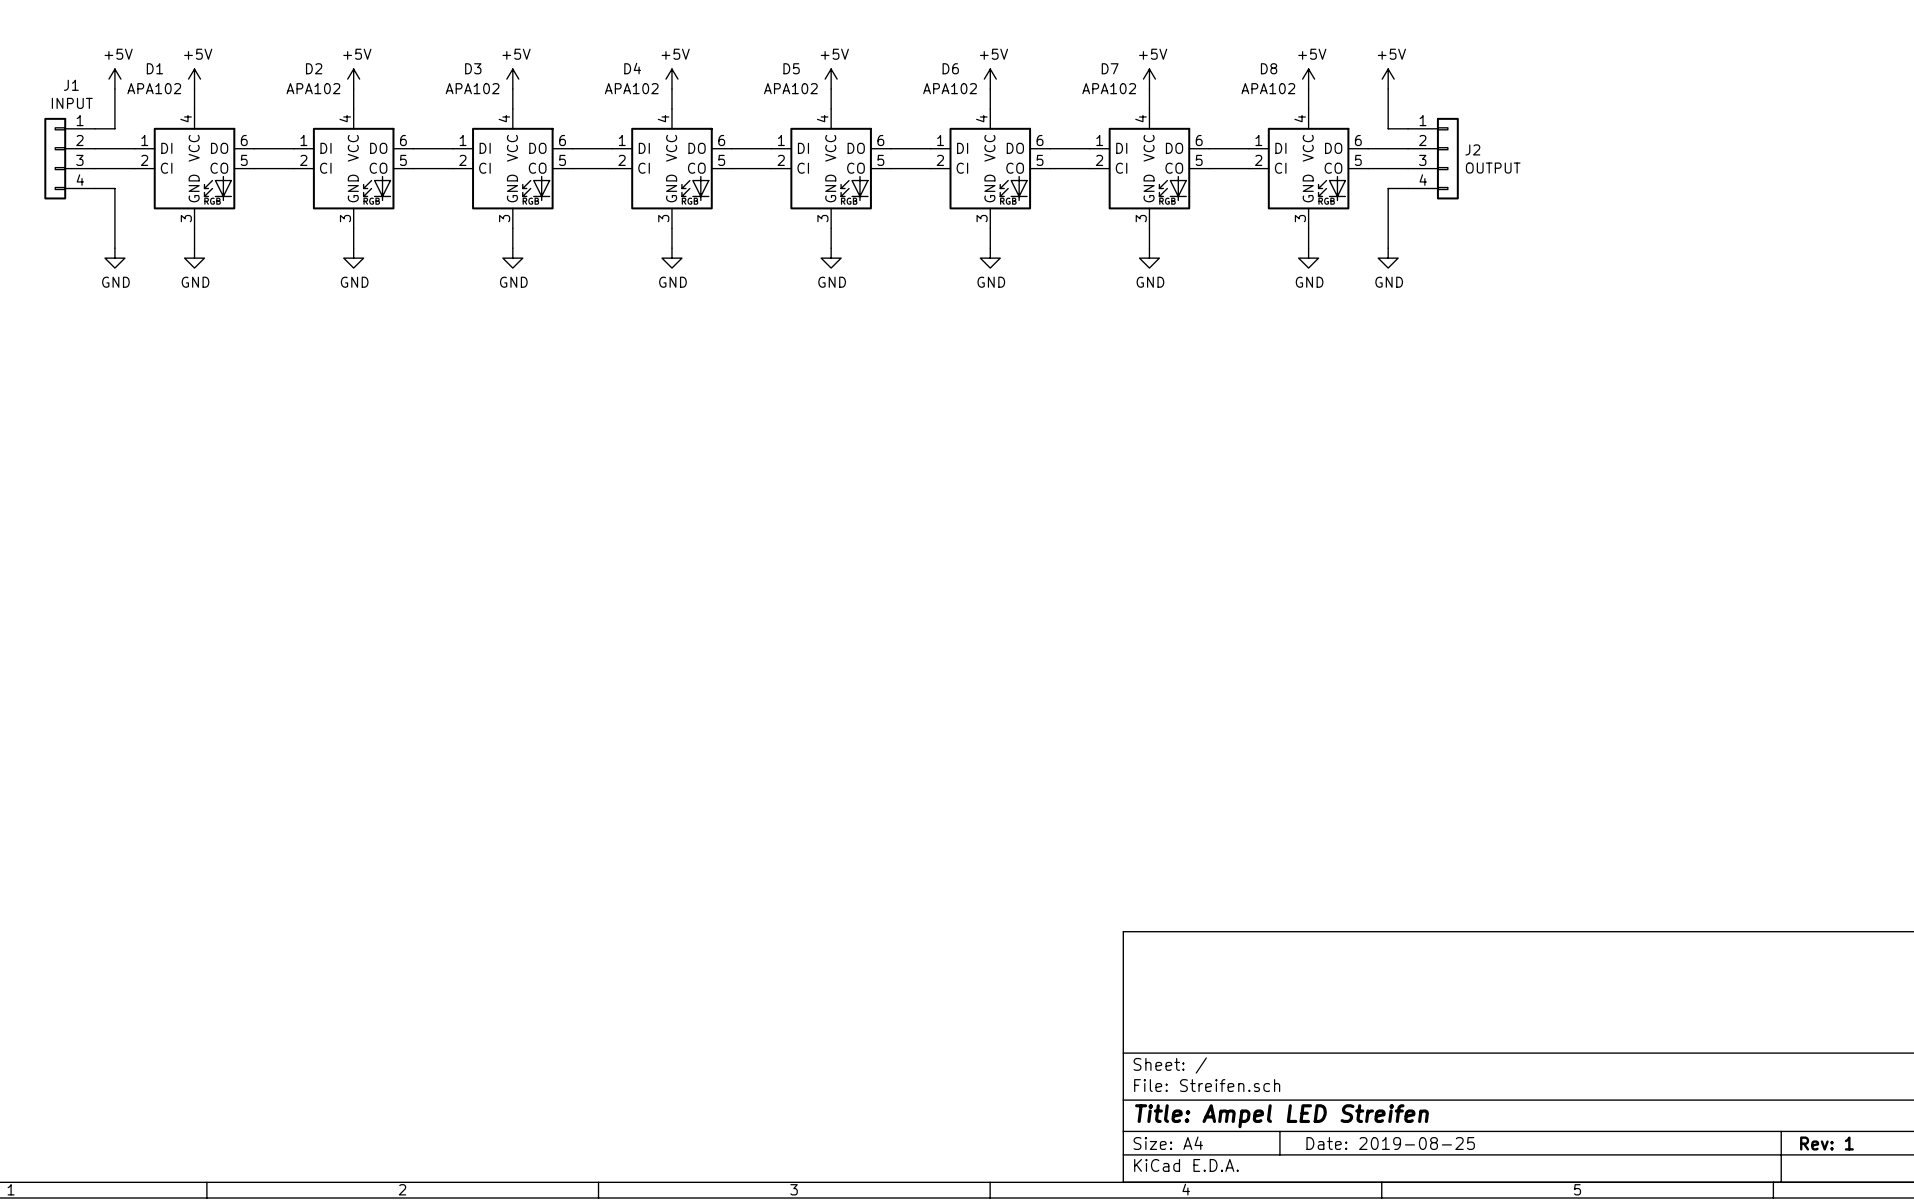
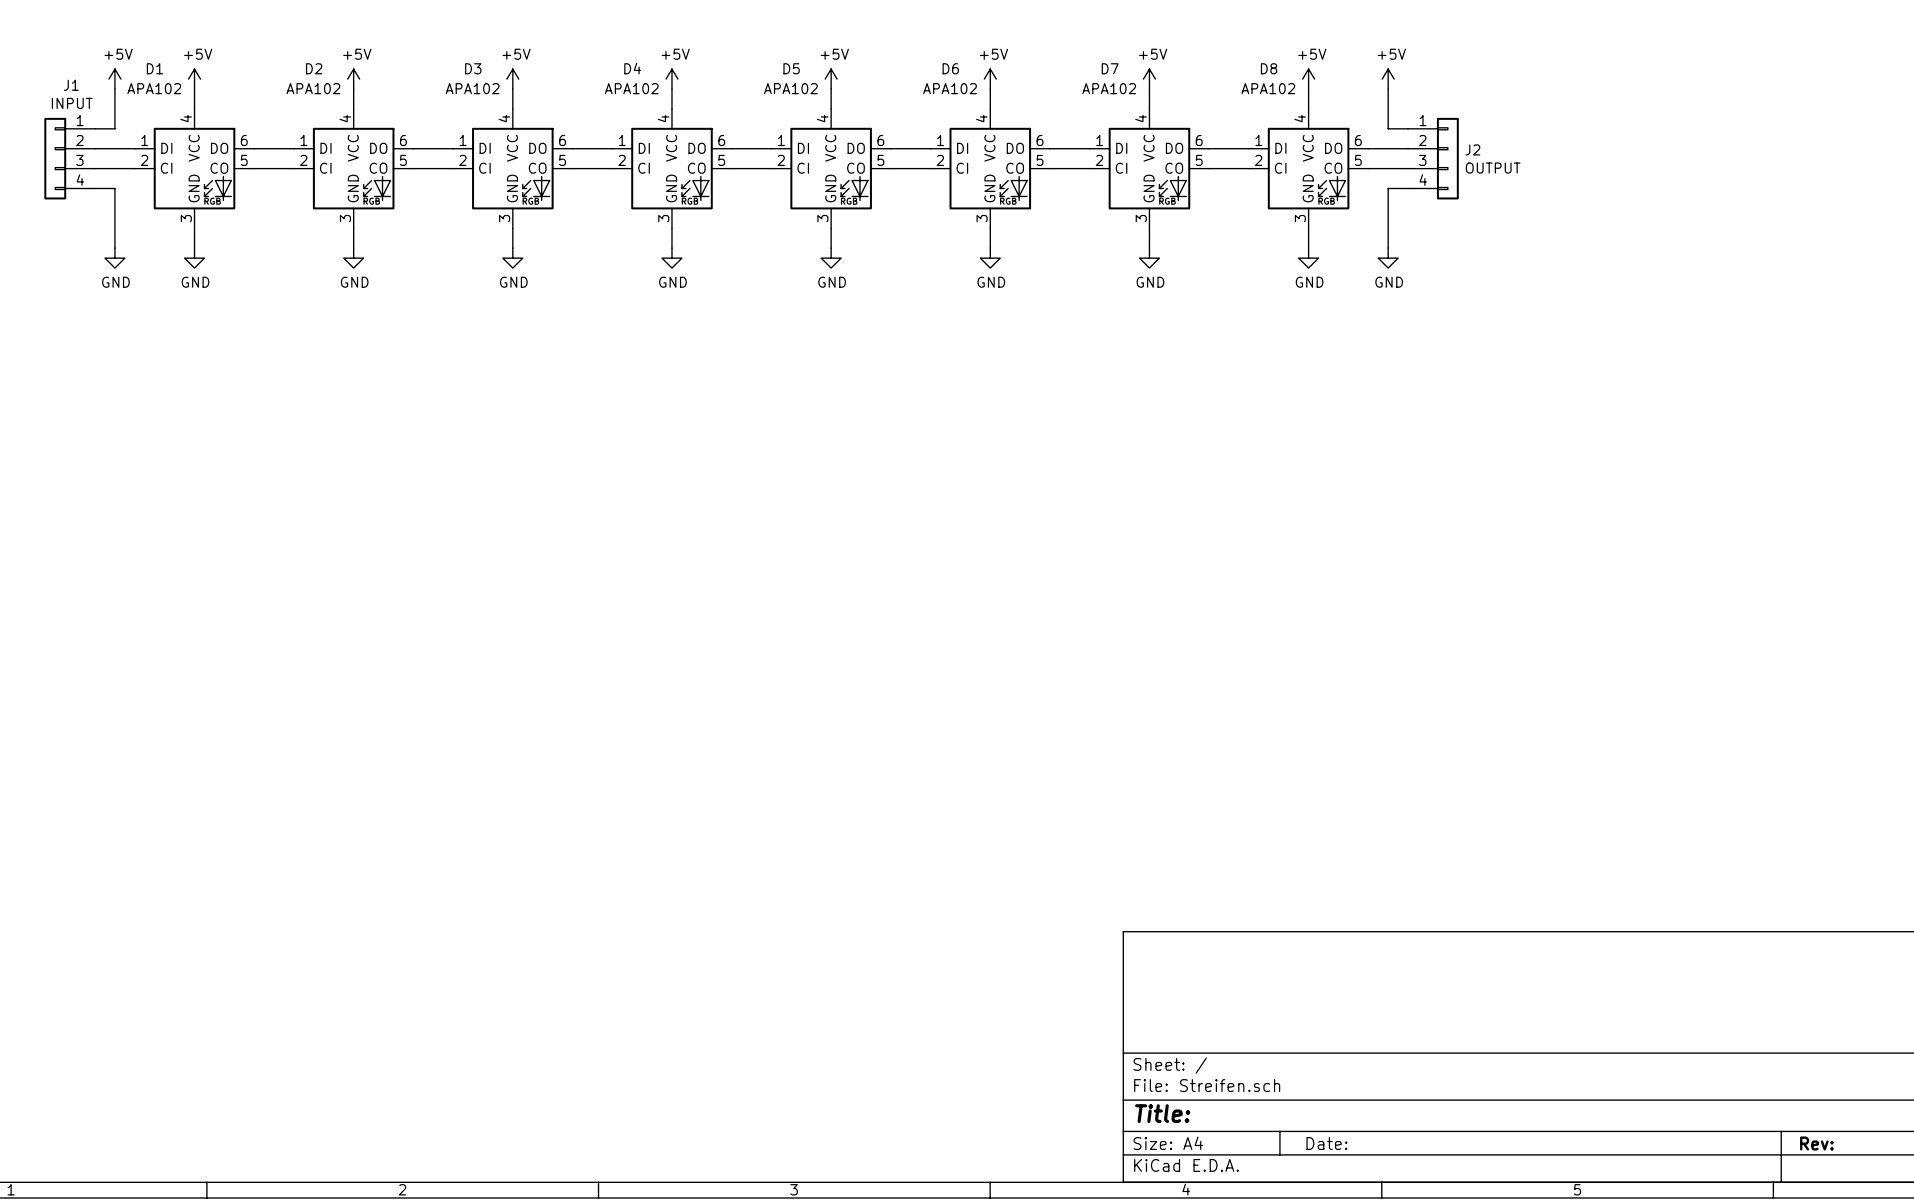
title block: Title: Ampel LED Streifen (1282, 1116) -> Title: (1162, 1113)
title block: Date: 2019-08-25 (1390, 1143) -> Date: (1326, 1143)
title block: Rev: 1 (1826, 1143) -> Rev: (1816, 1143)

